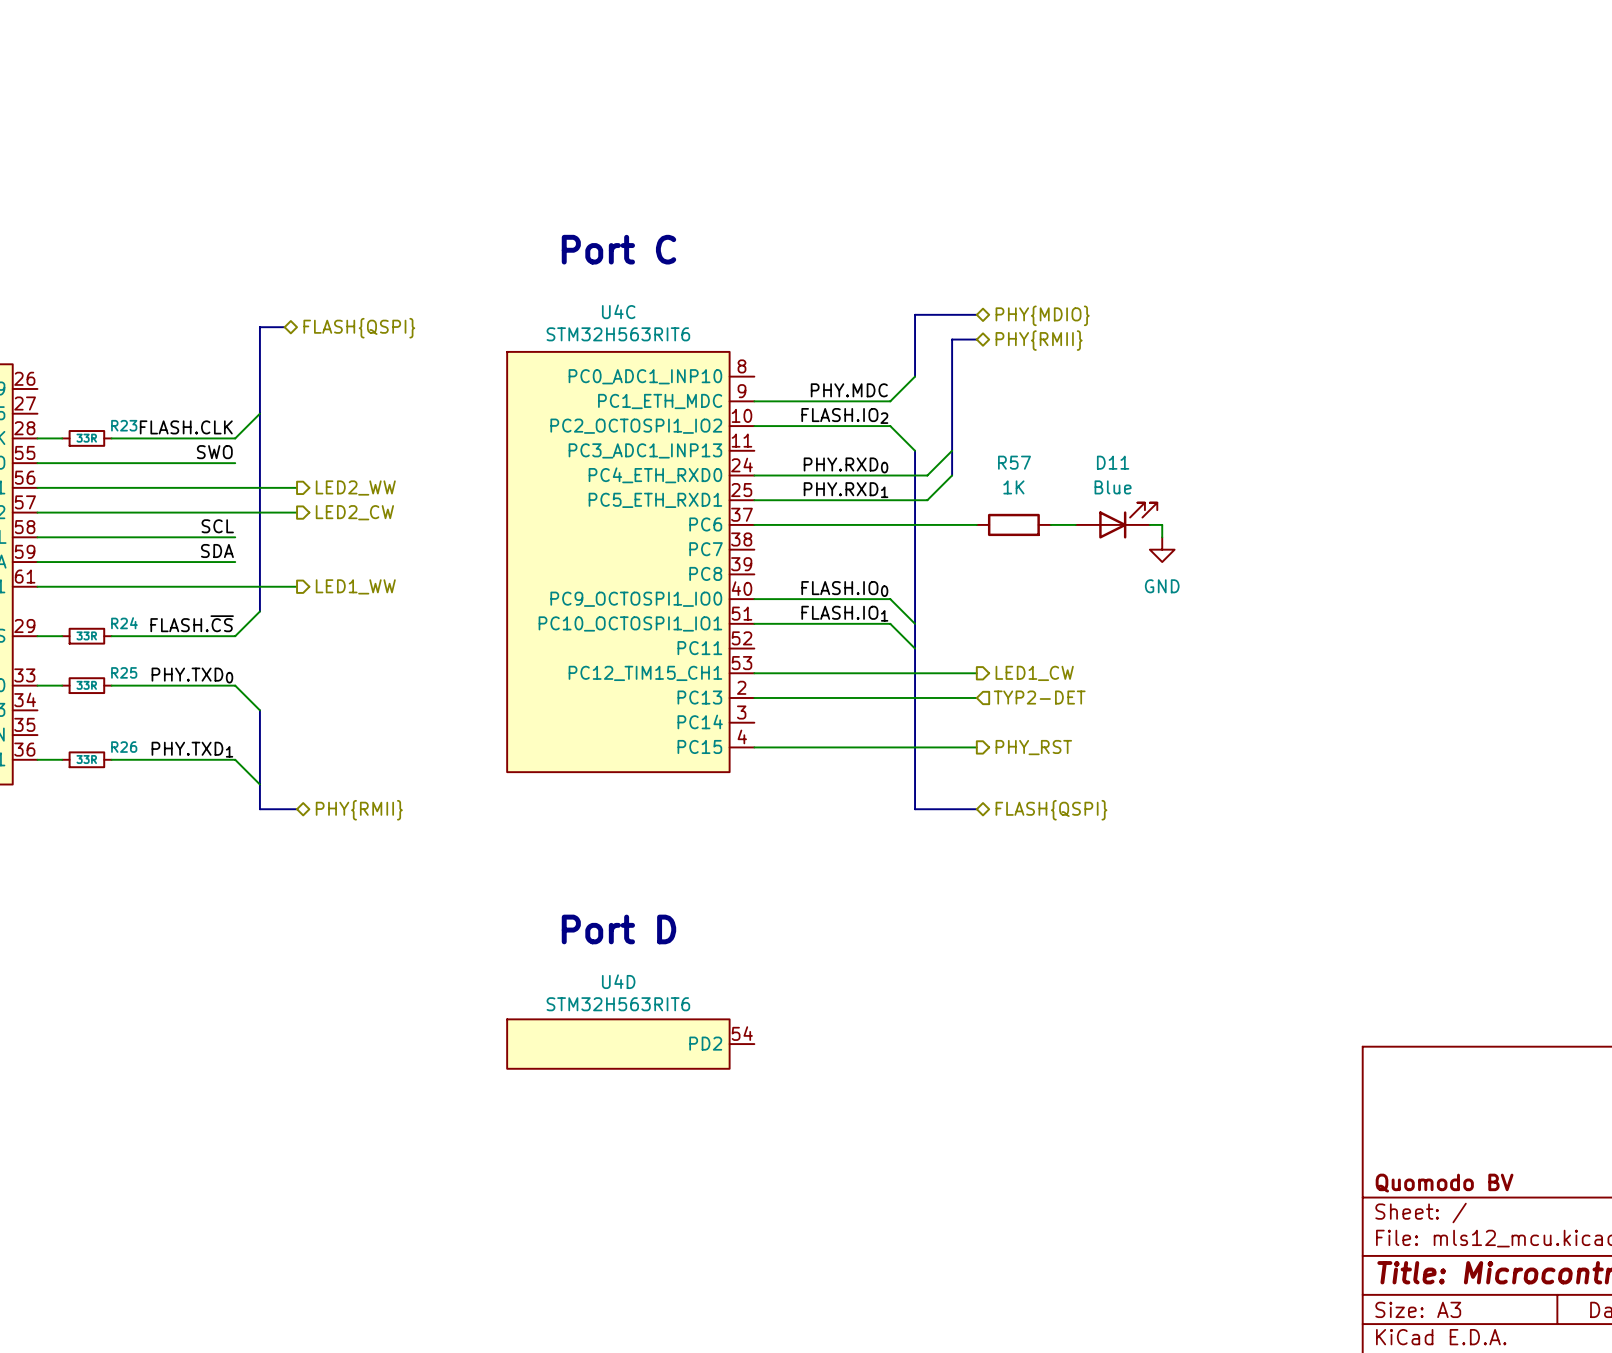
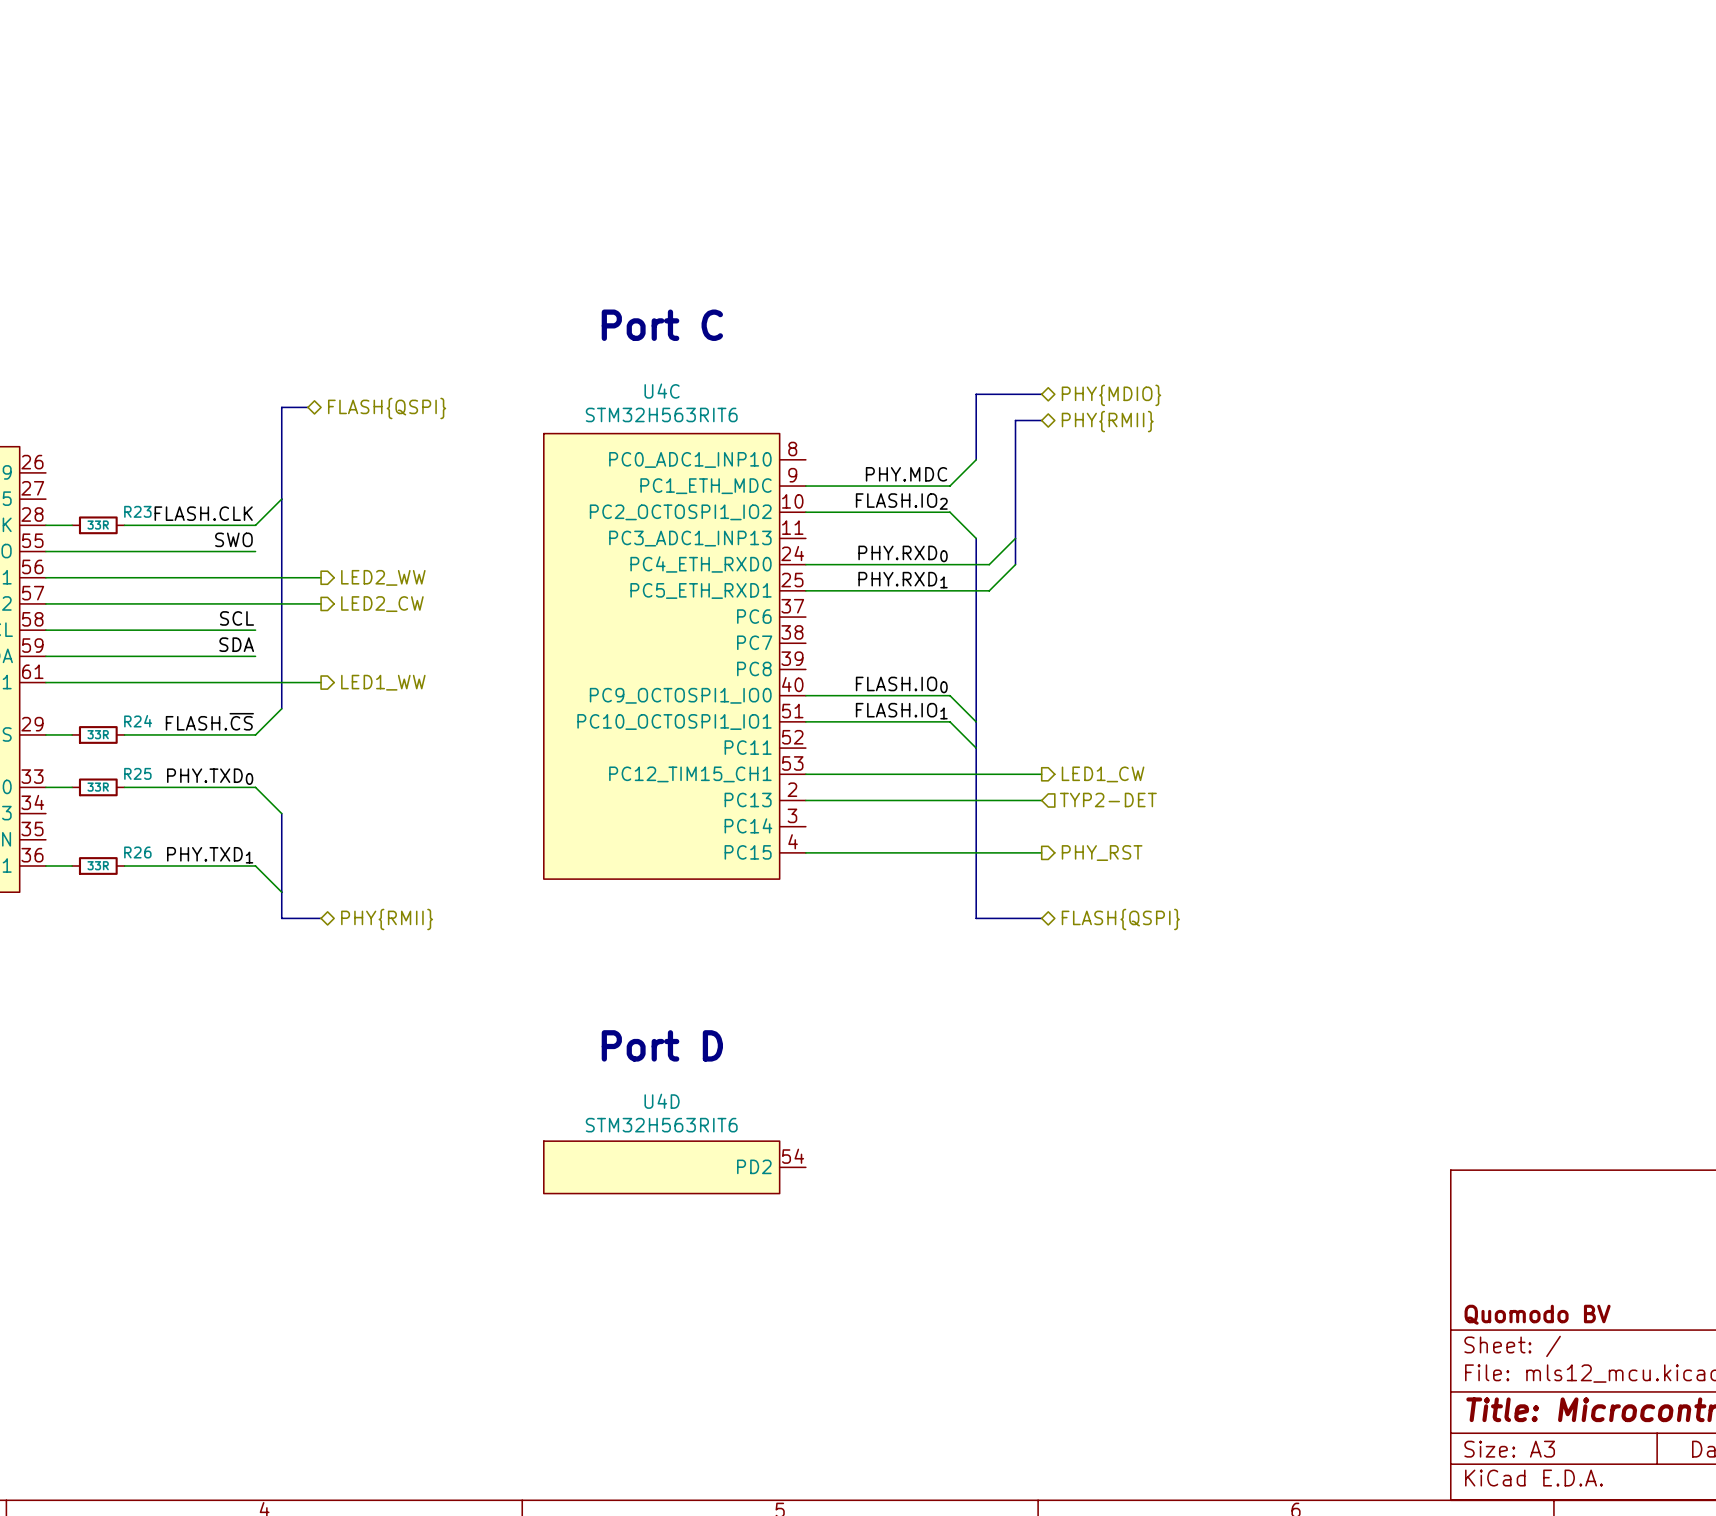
D11: Blue (1116, 520) -> none
wire: (754, 524) (976, 524) -> none
R57: 1K (1013, 524) -> none
wire: (1050, 524) (1075, 524) -> none
wire: (1149, 524) (1162, 524) (1162, 537) -> none
power symbol: GND (1162, 549) -> none

